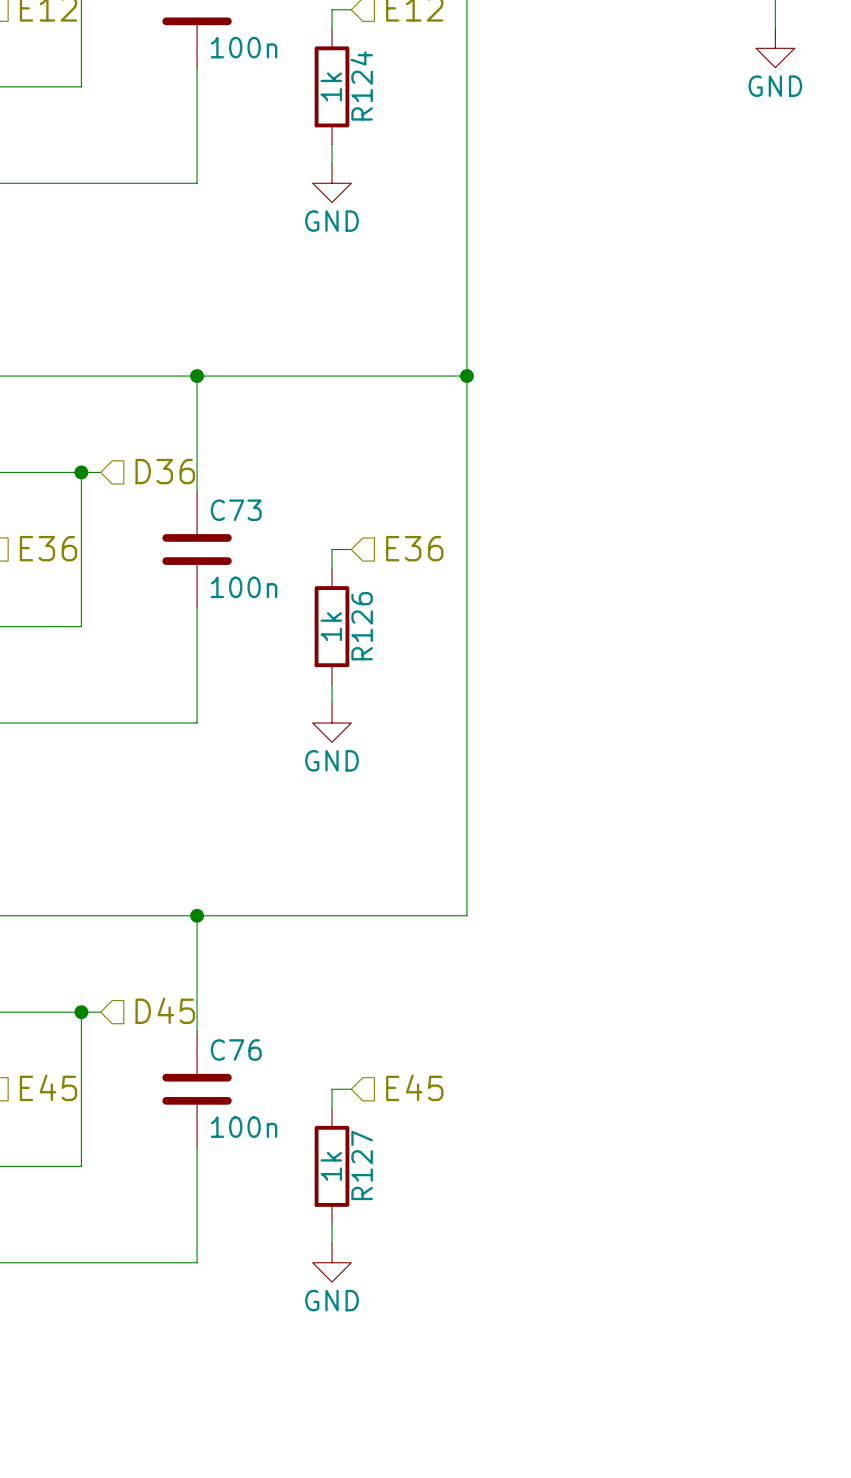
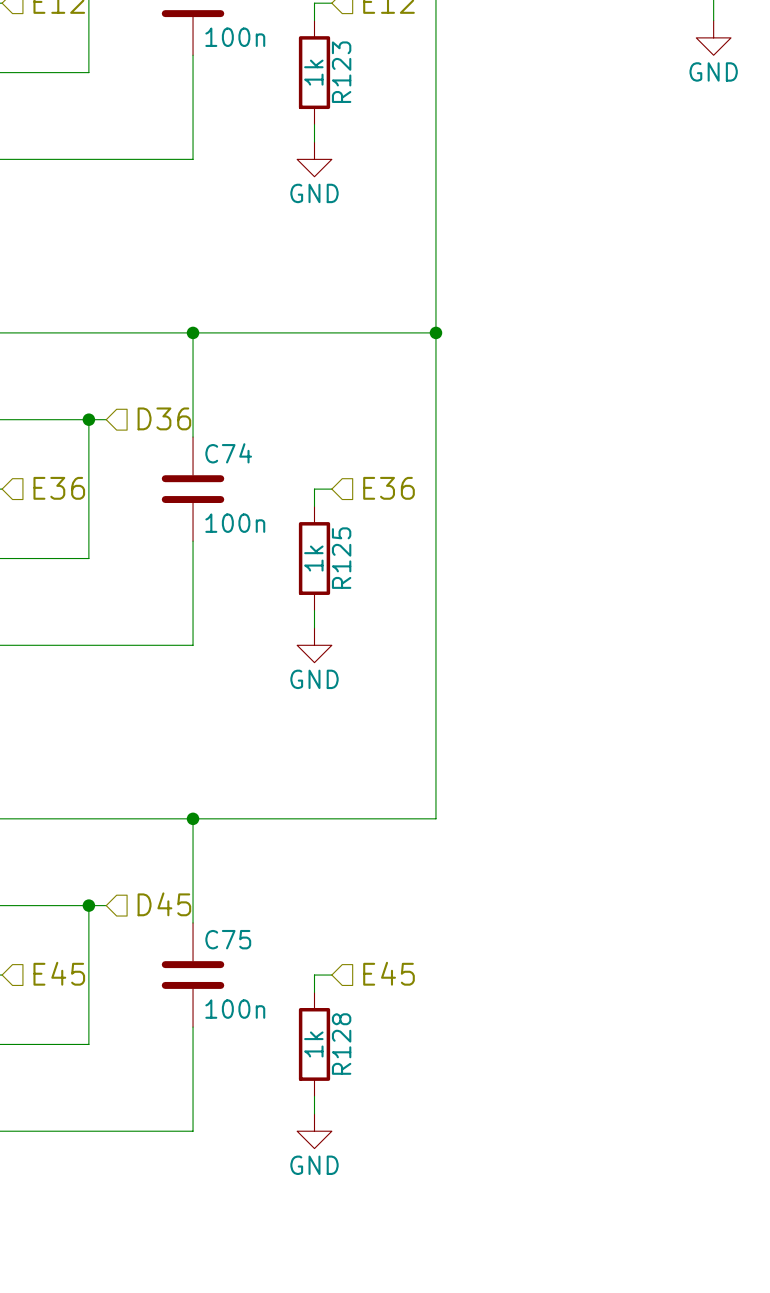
R124 name: R124 (361, 85) -> R123 (341, 72)
C73 name: C73 (236, 510) -> C74 (228, 453)
R126 name: R126 (362, 626) -> R125 (341, 558)
C76 name: C76 (236, 1050) -> C75 (228, 939)
R127 name: R127 (362, 1165) -> R128 (341, 1044)

